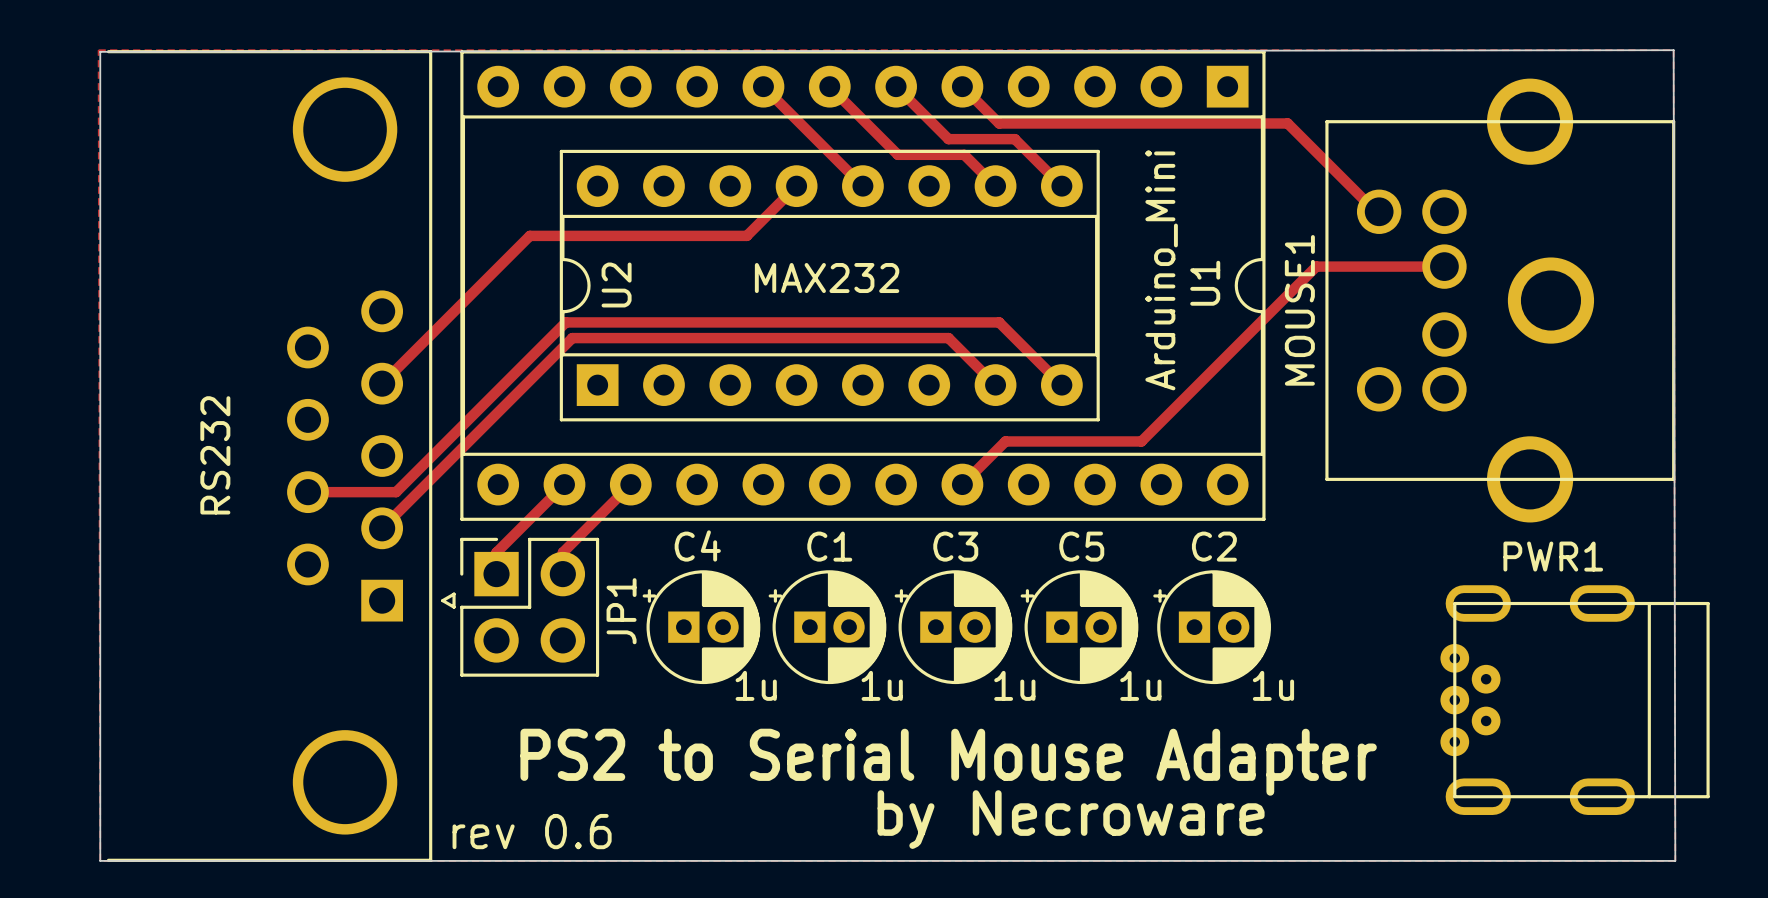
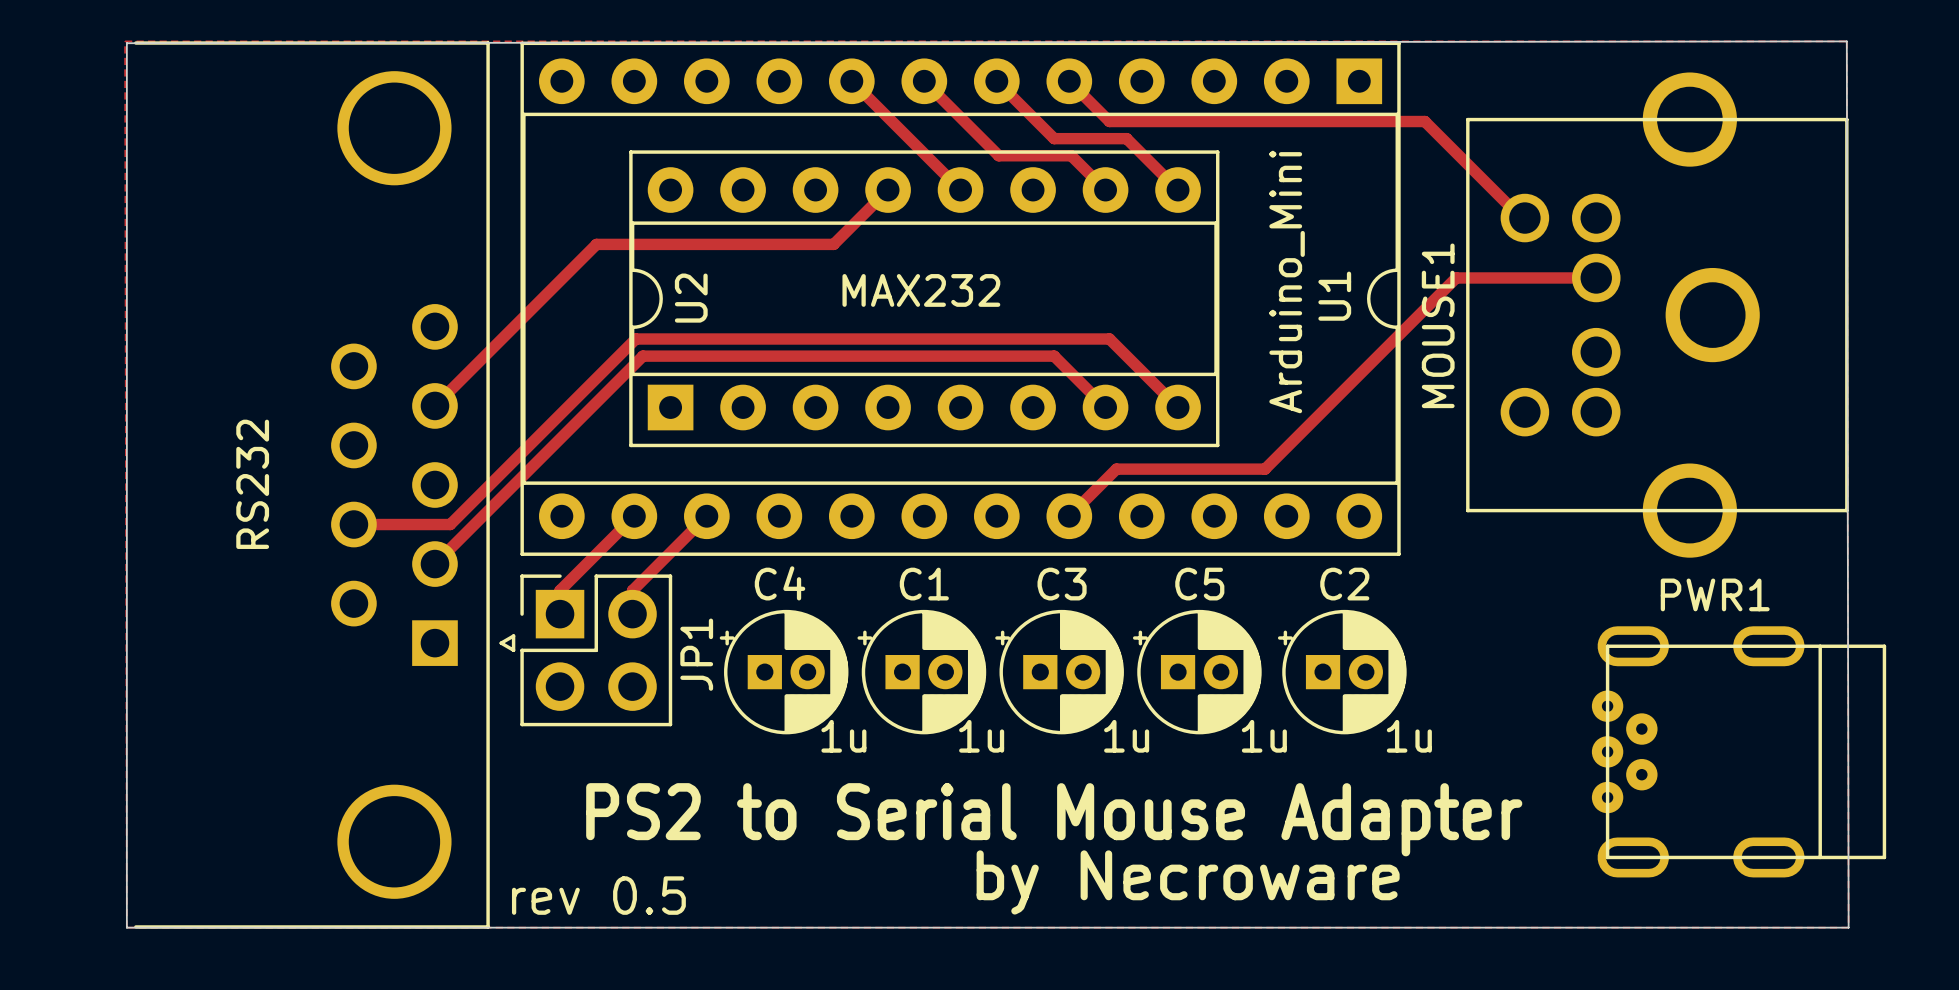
text: rev 0.6 (532, 831) -> rev 0.5 (598, 895)

